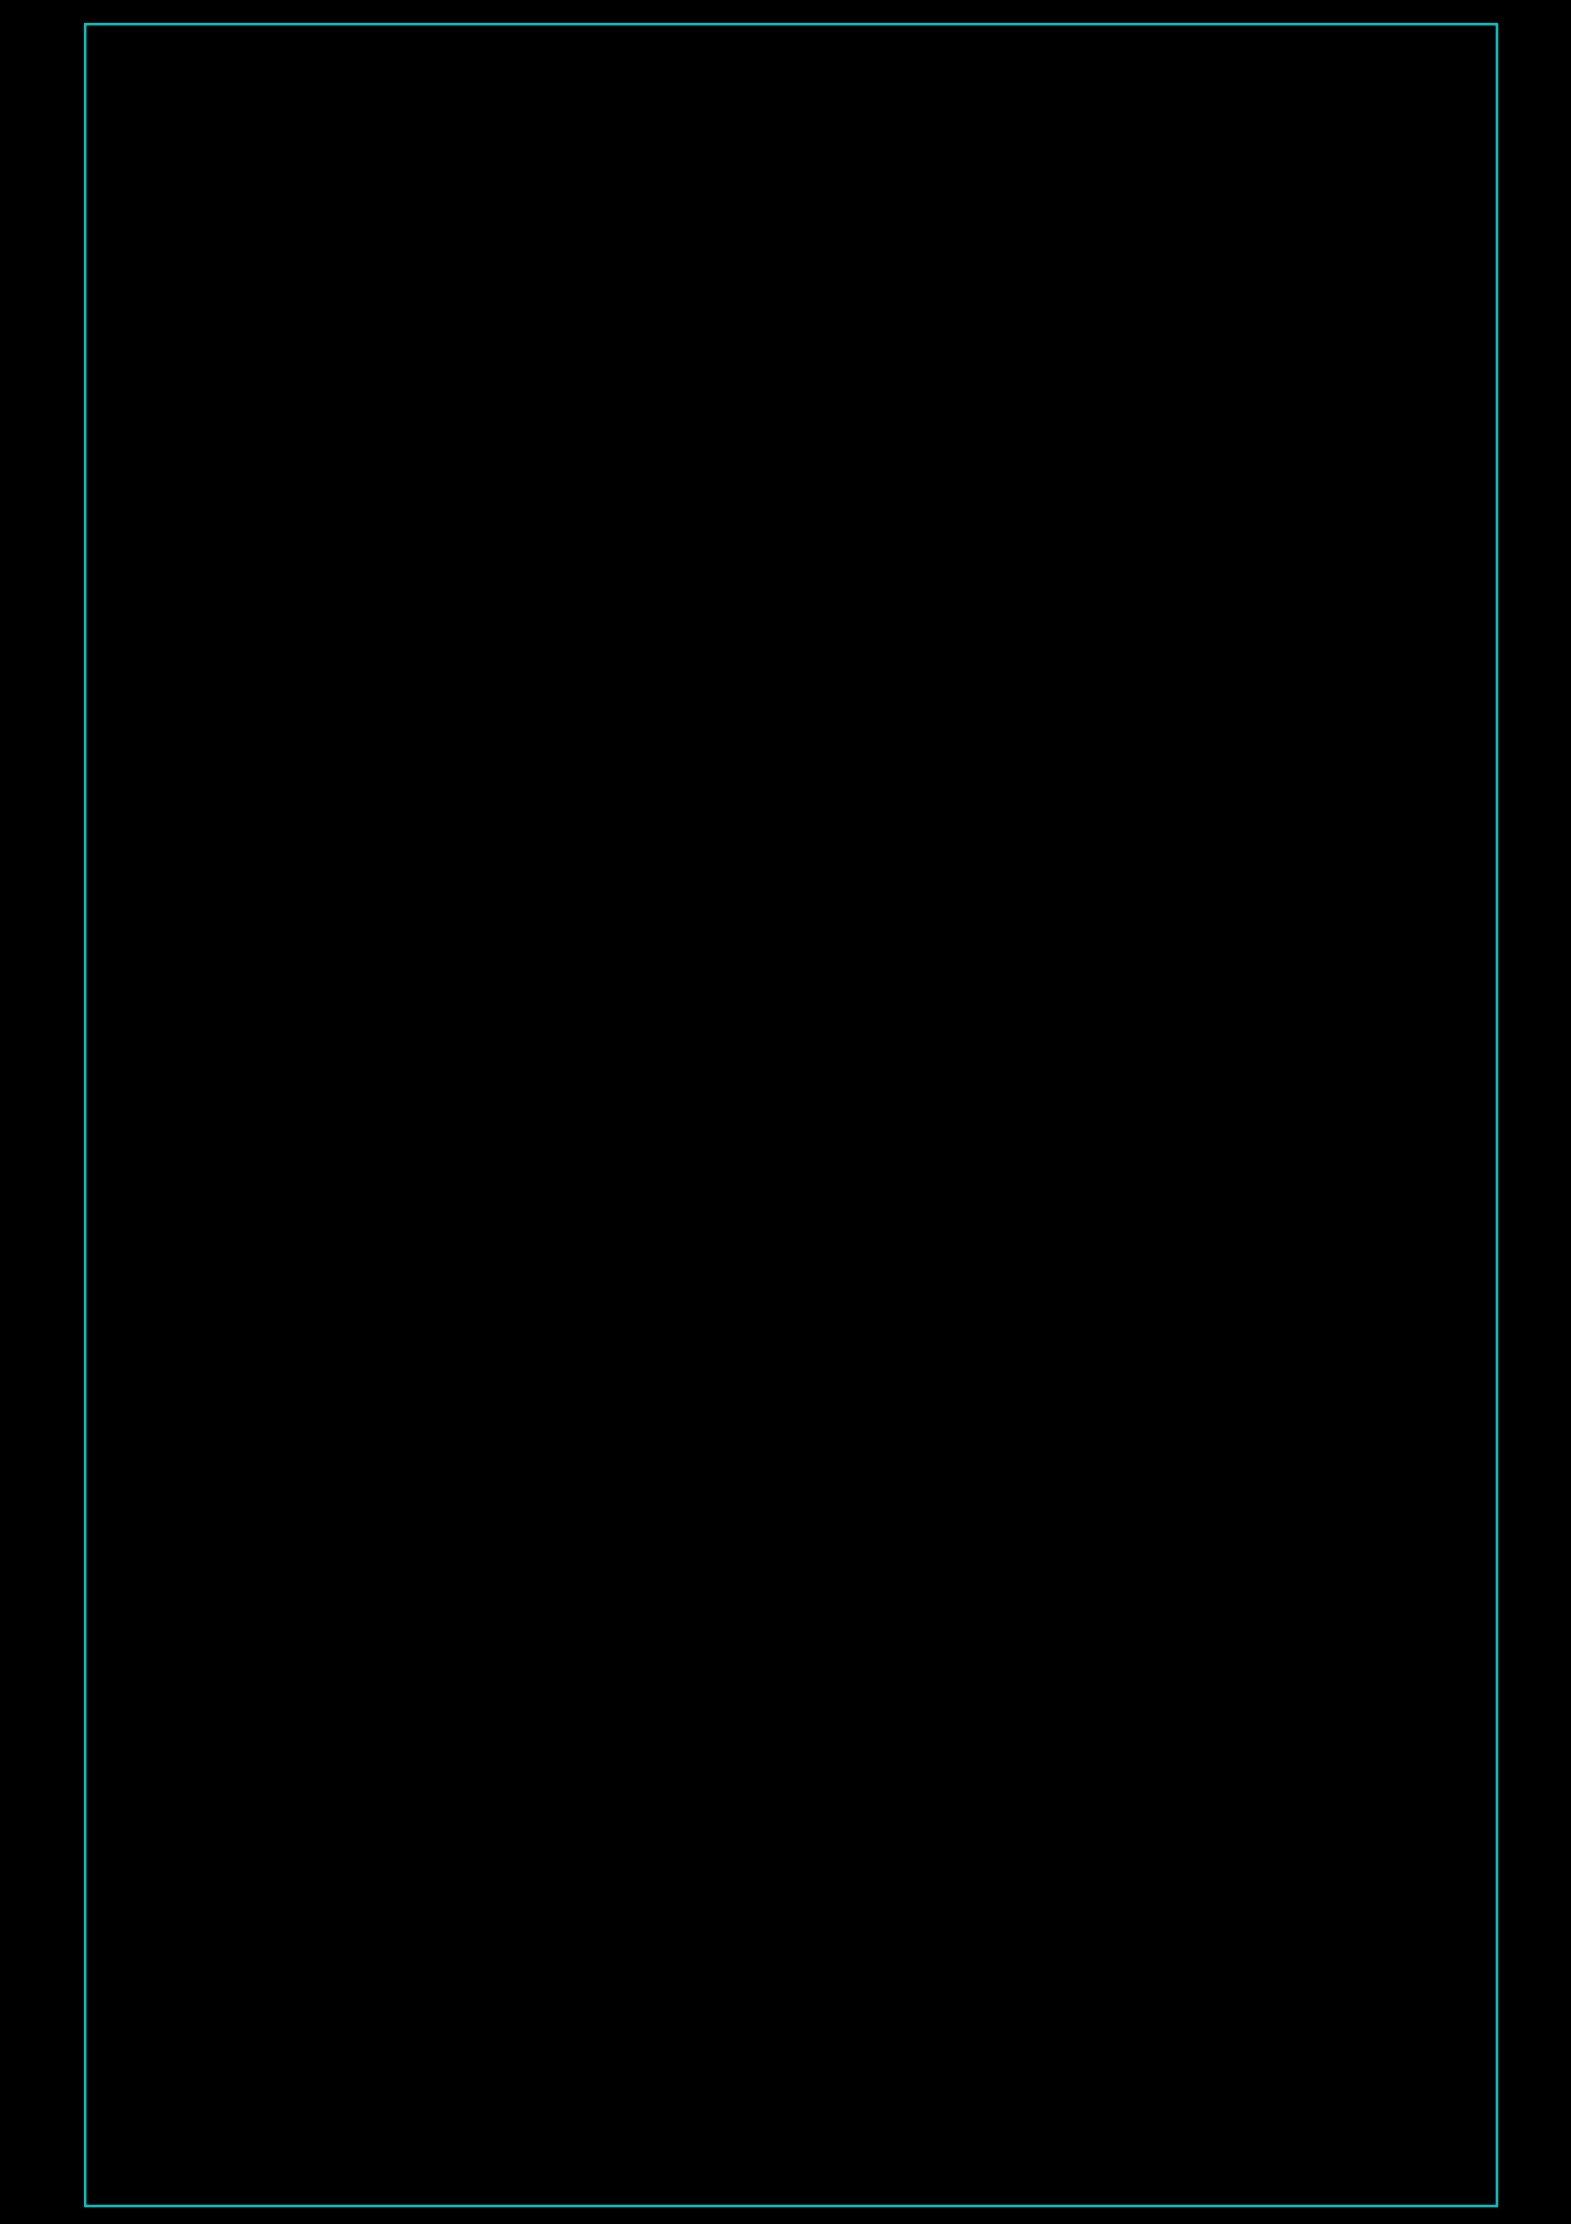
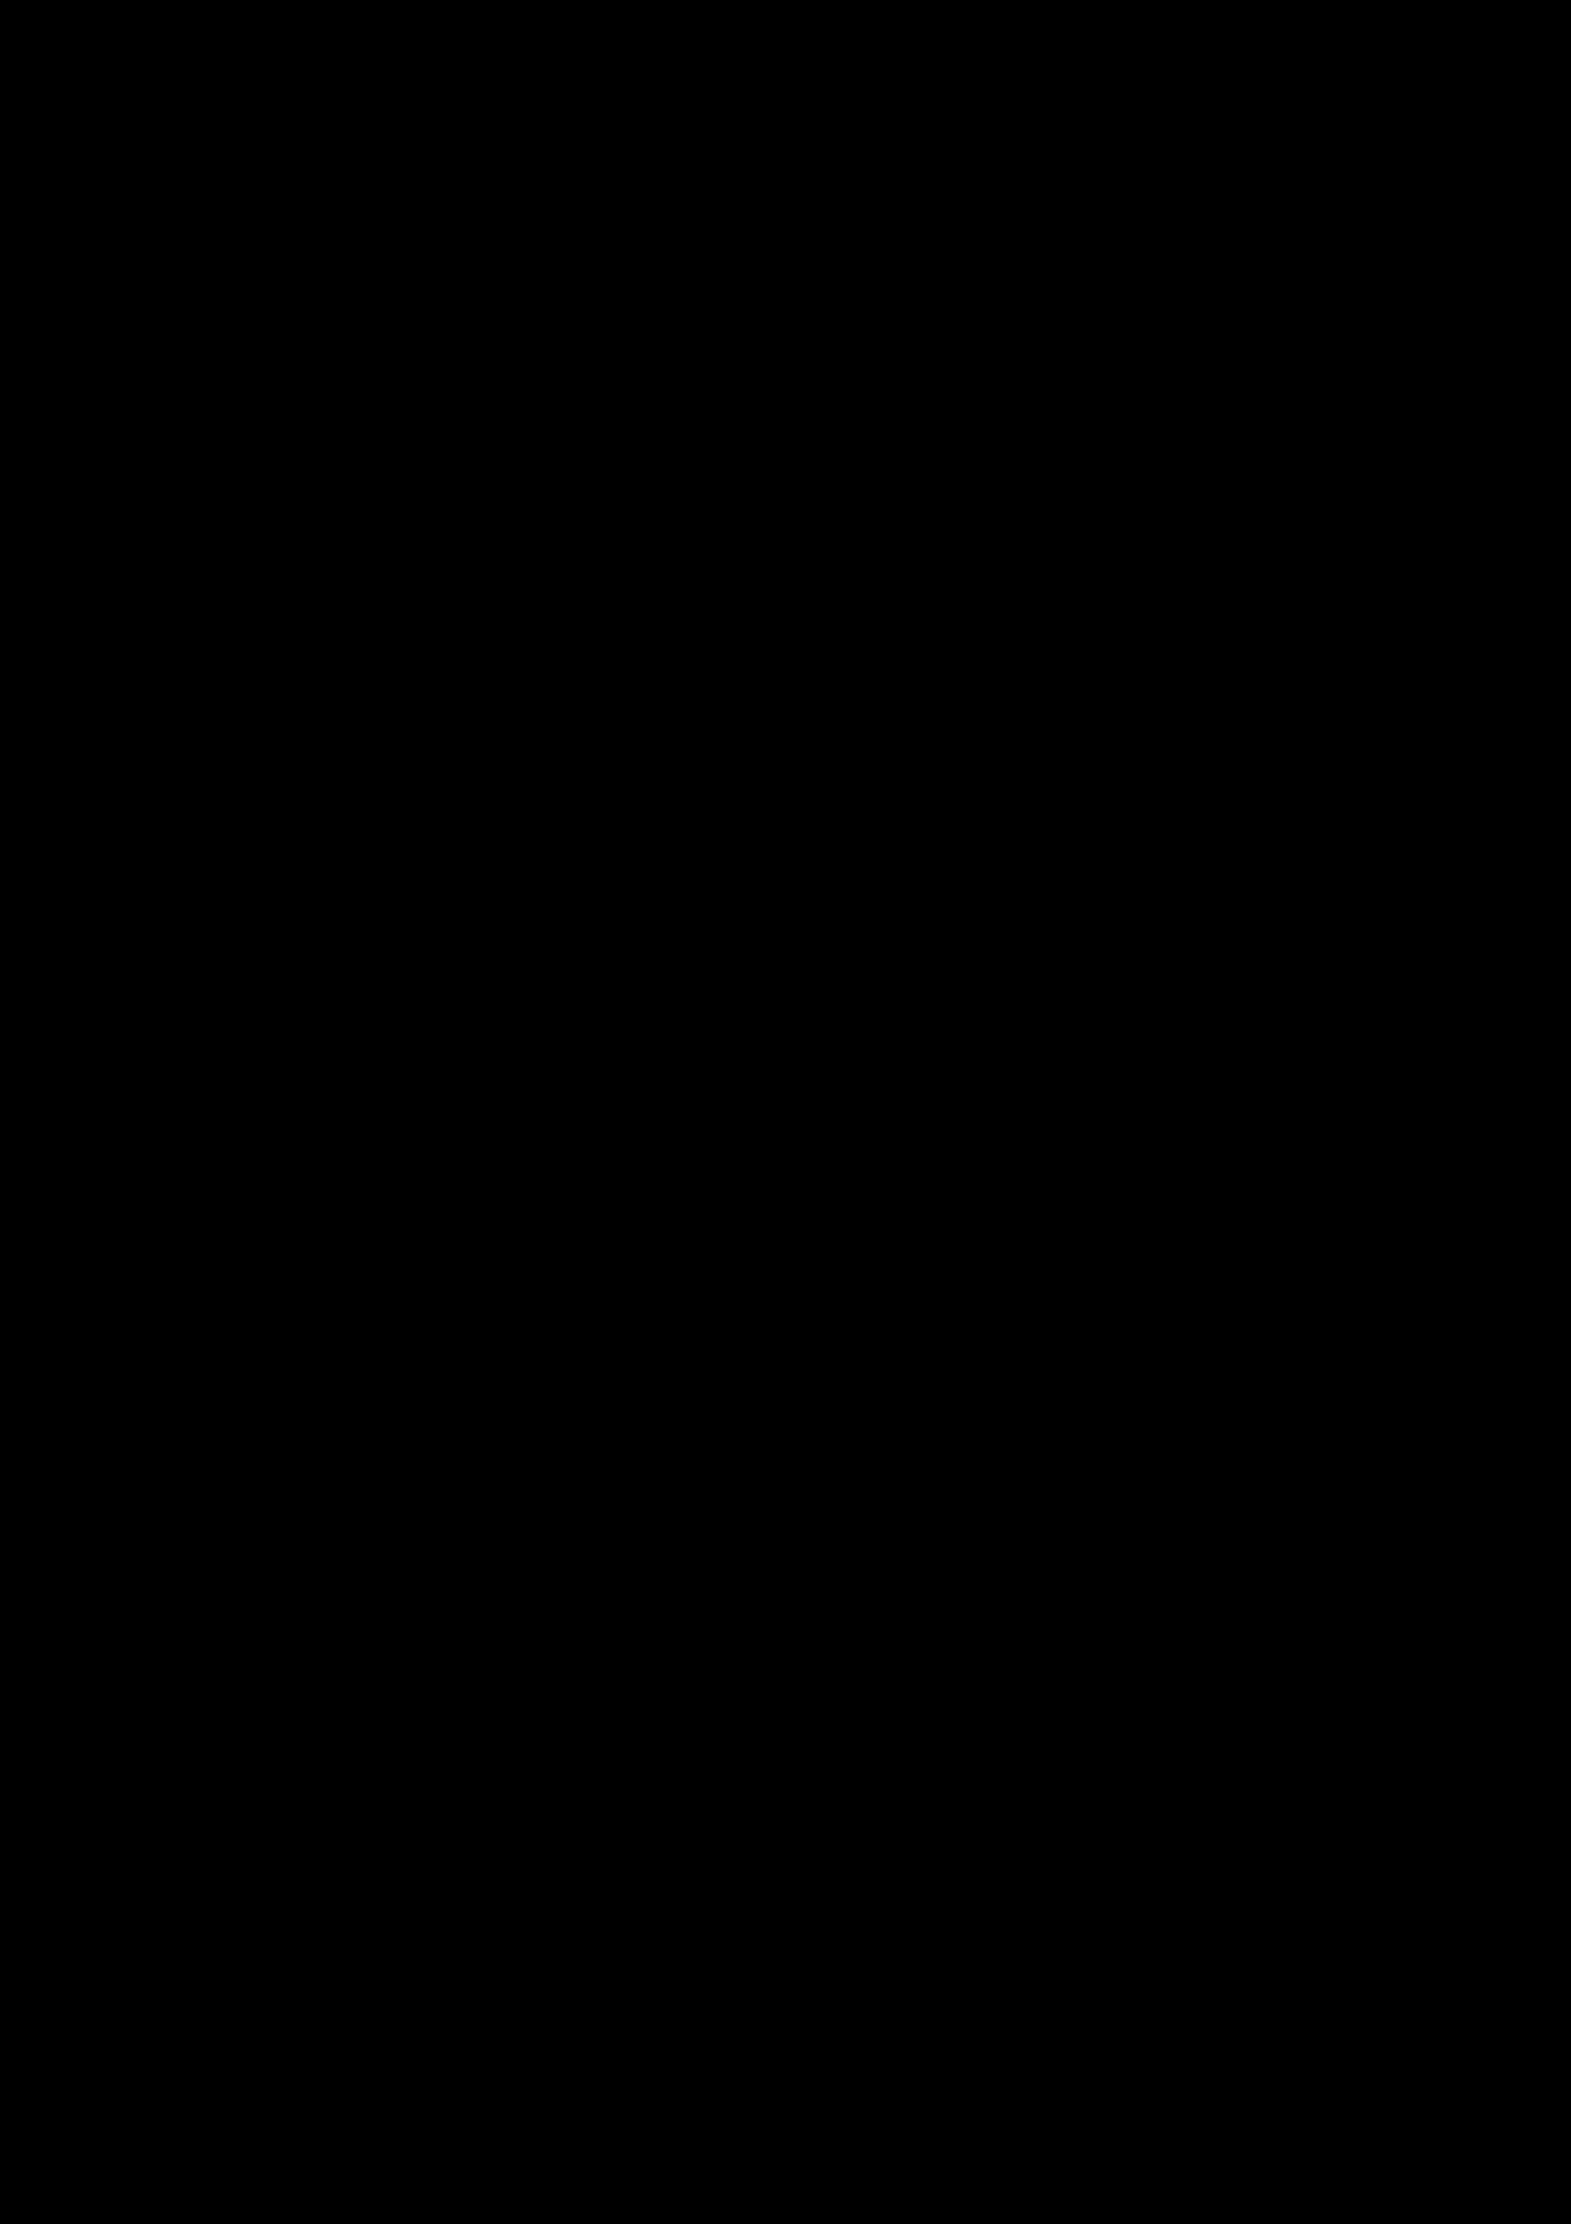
line: (85, 24) (1496, 24) (1496, 2206) (85, 2206) (85, 24) -> none

